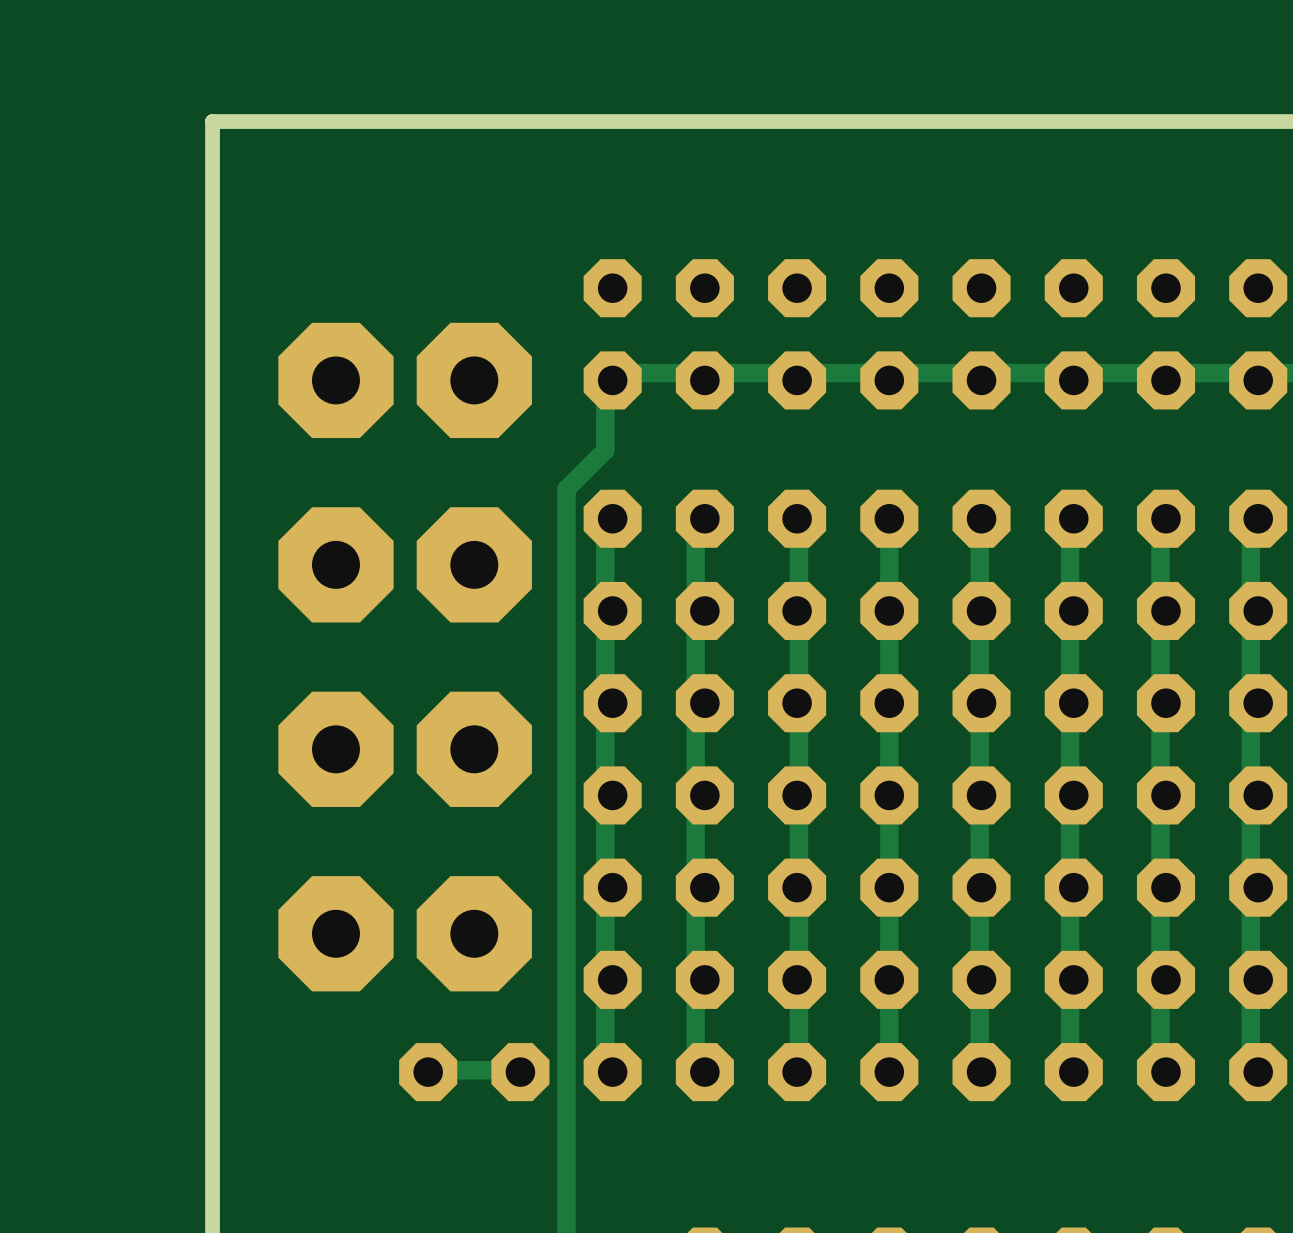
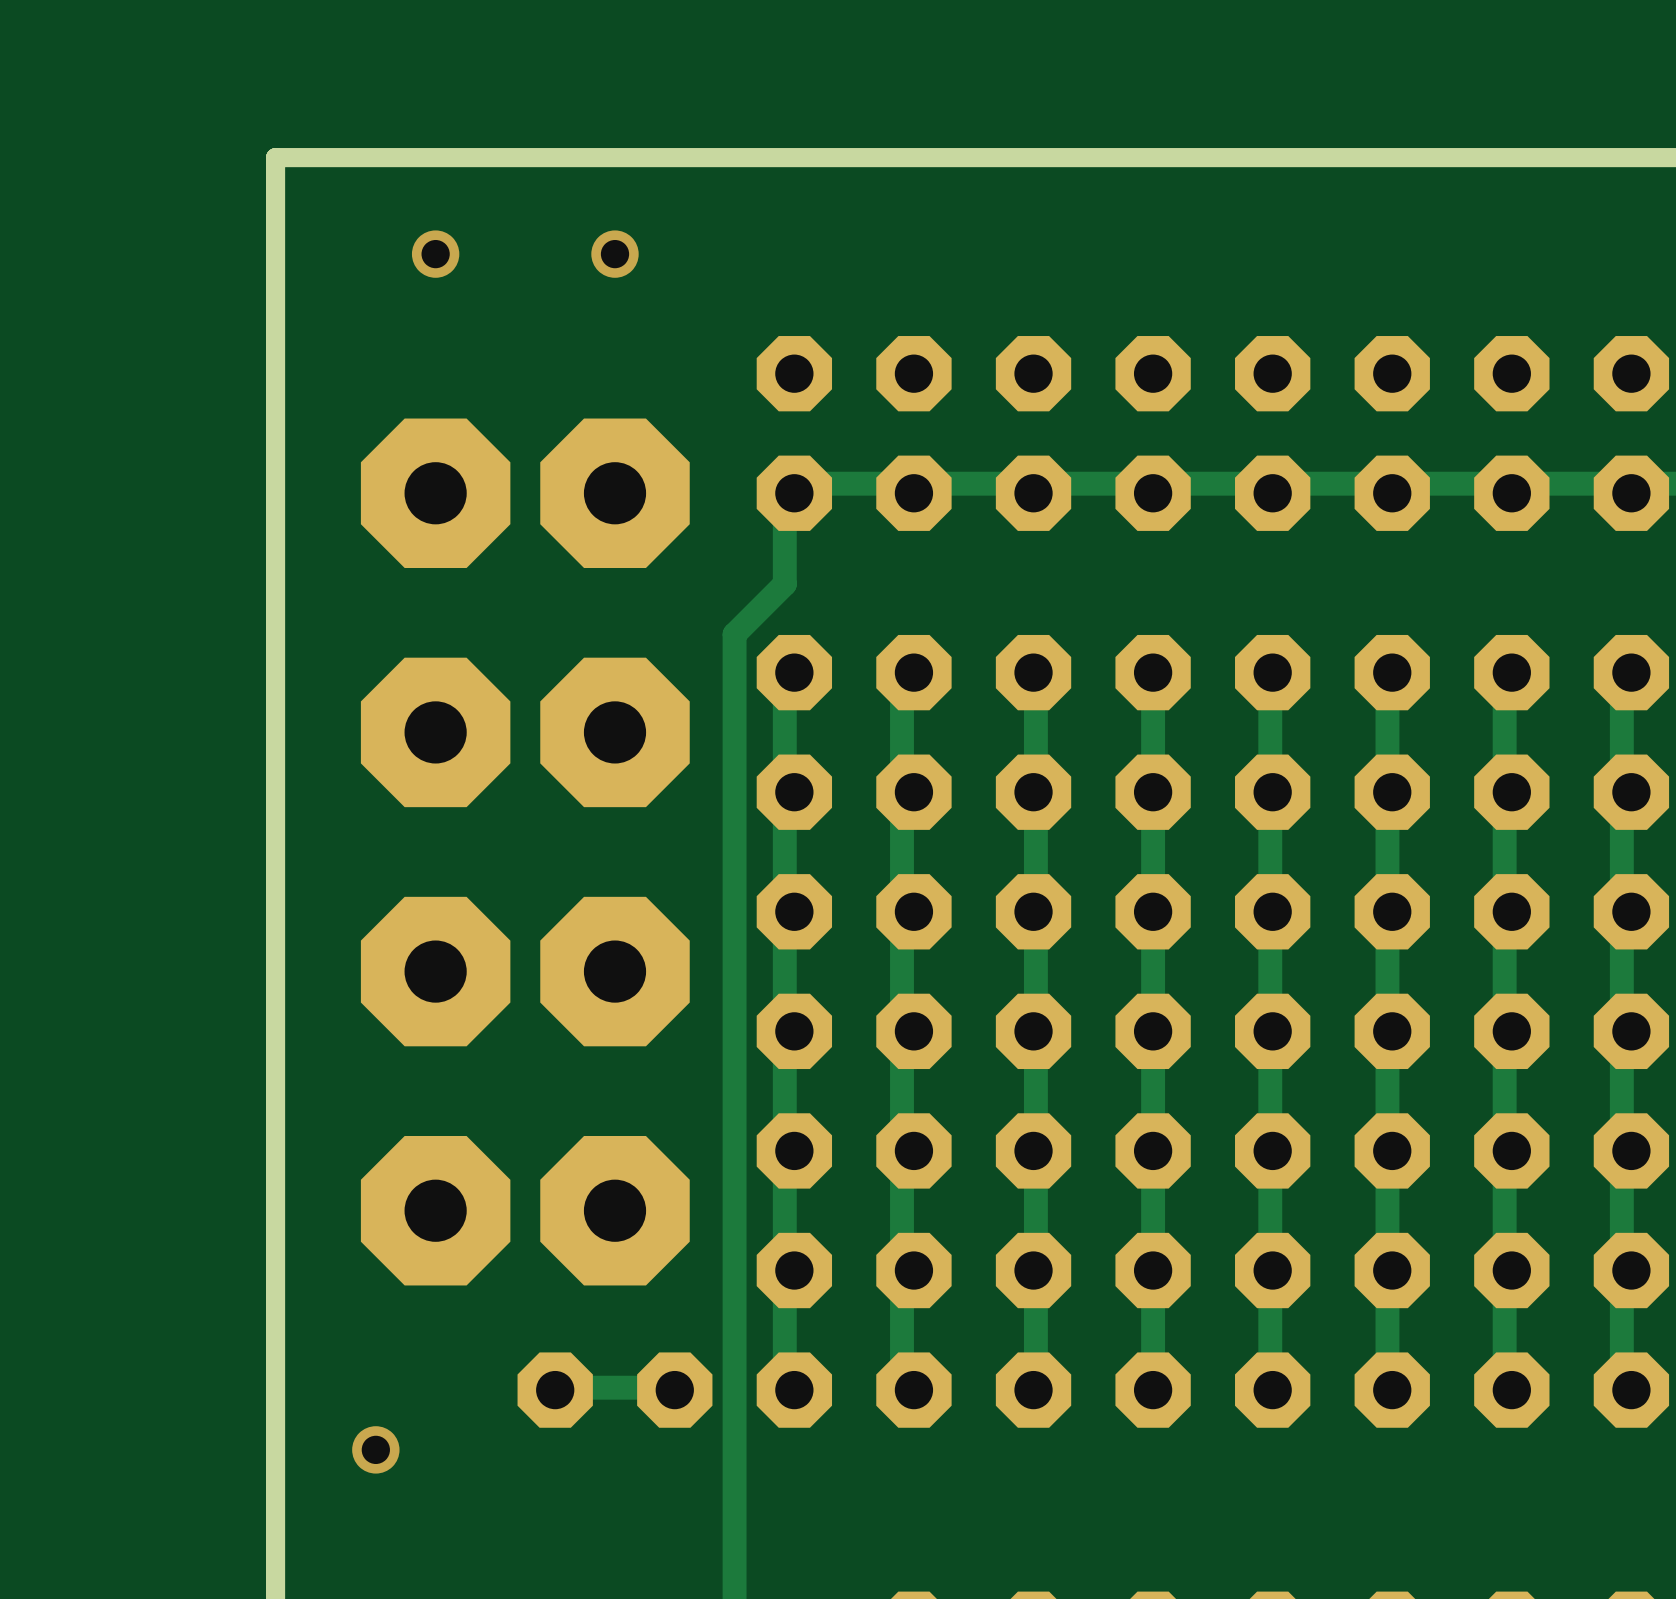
via: none -> (435, 254)
via: none -> (615, 254)
via: none -> (375, 1449)

